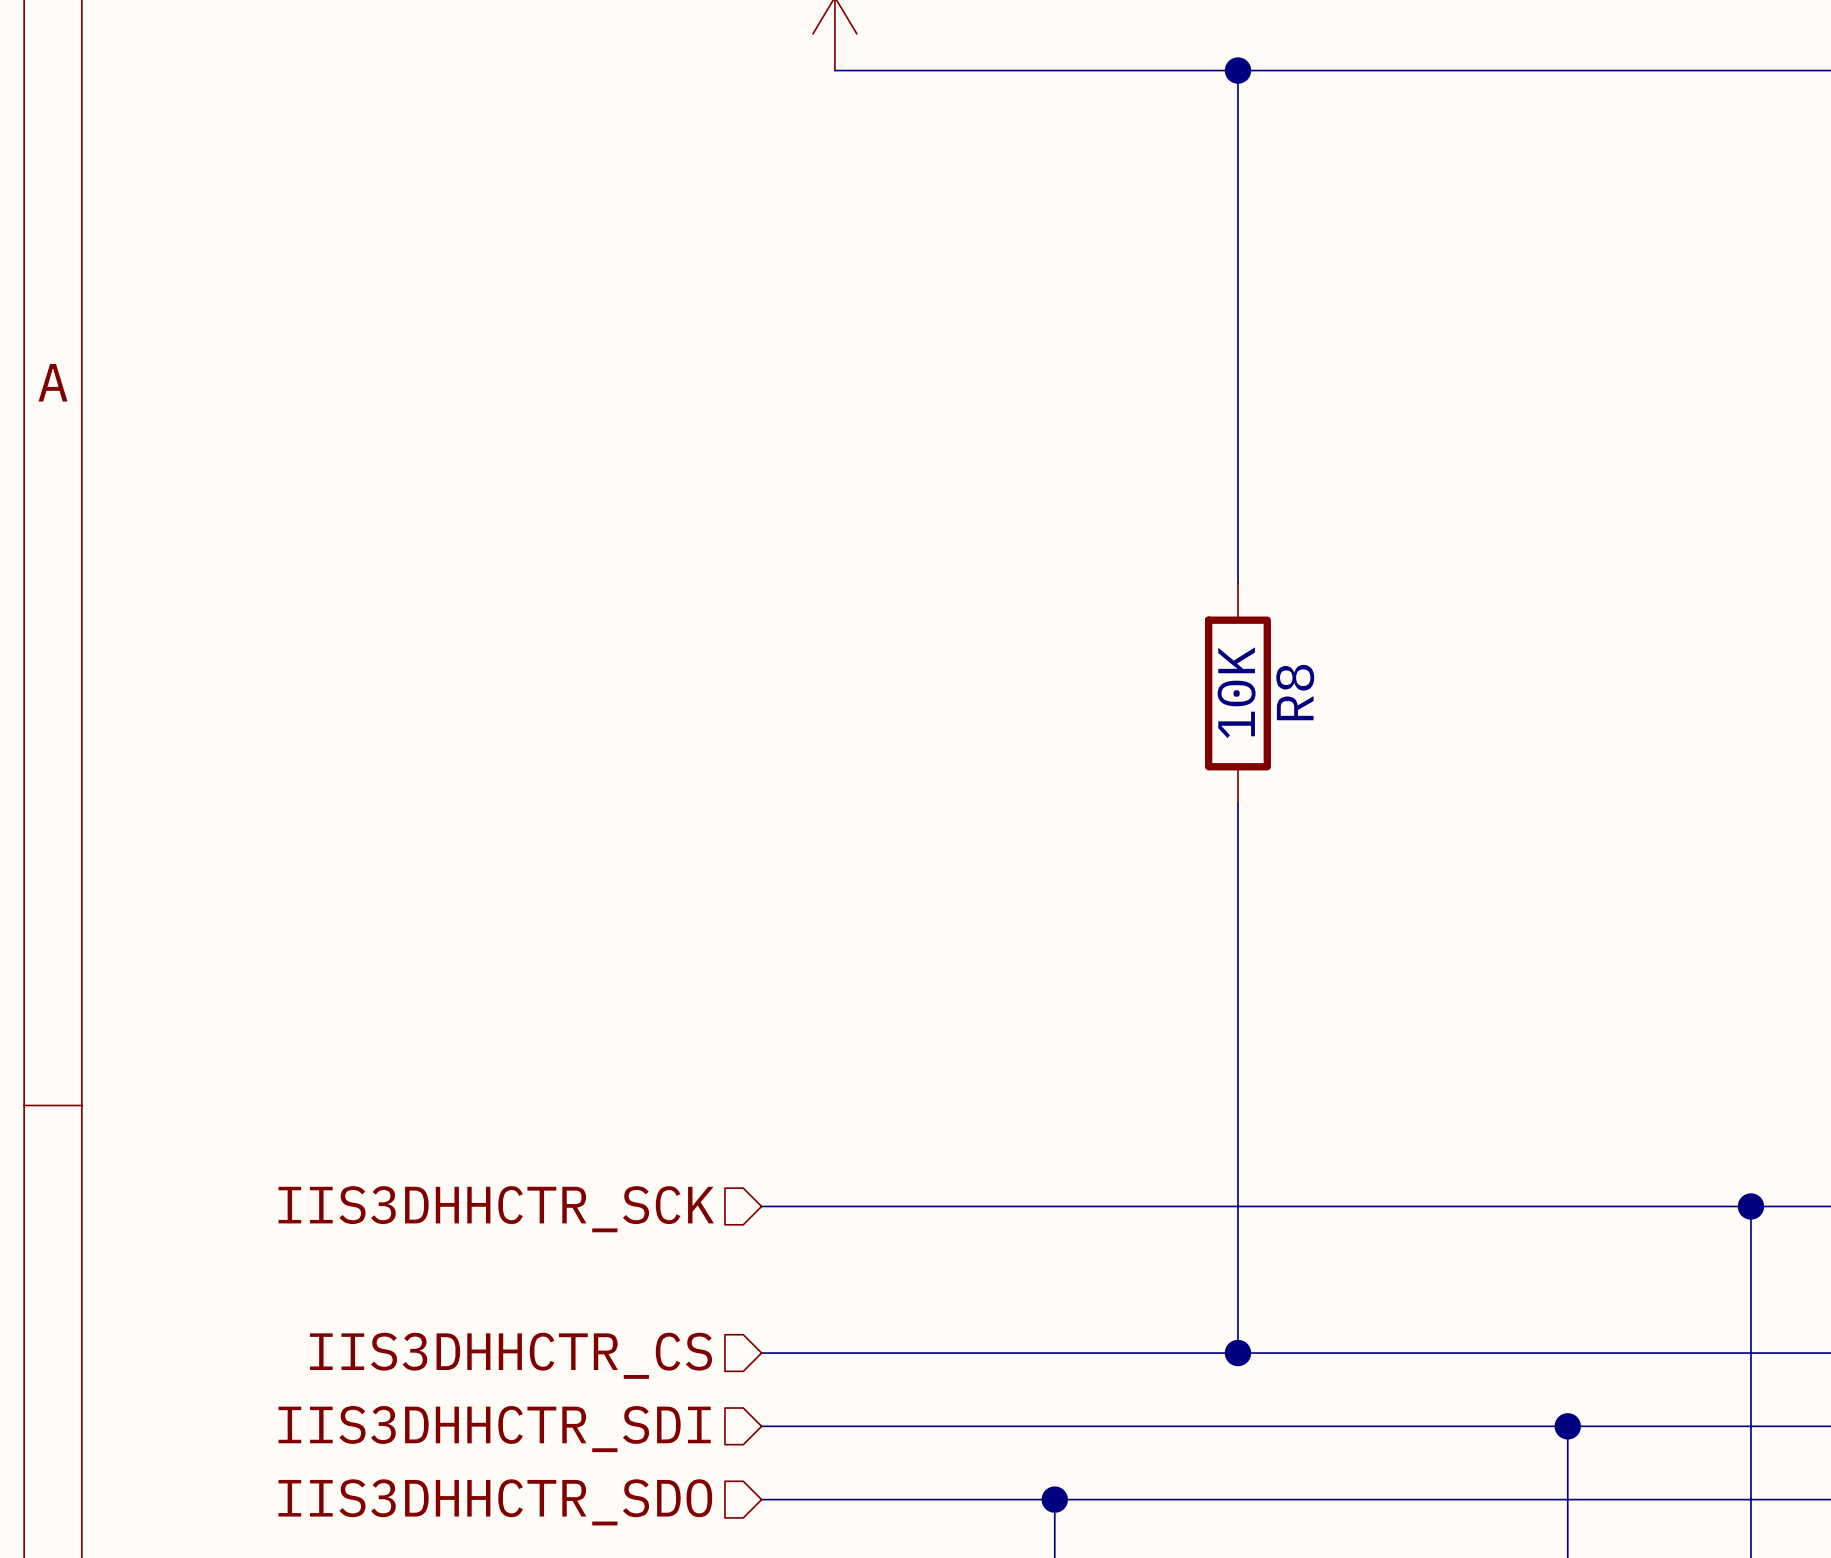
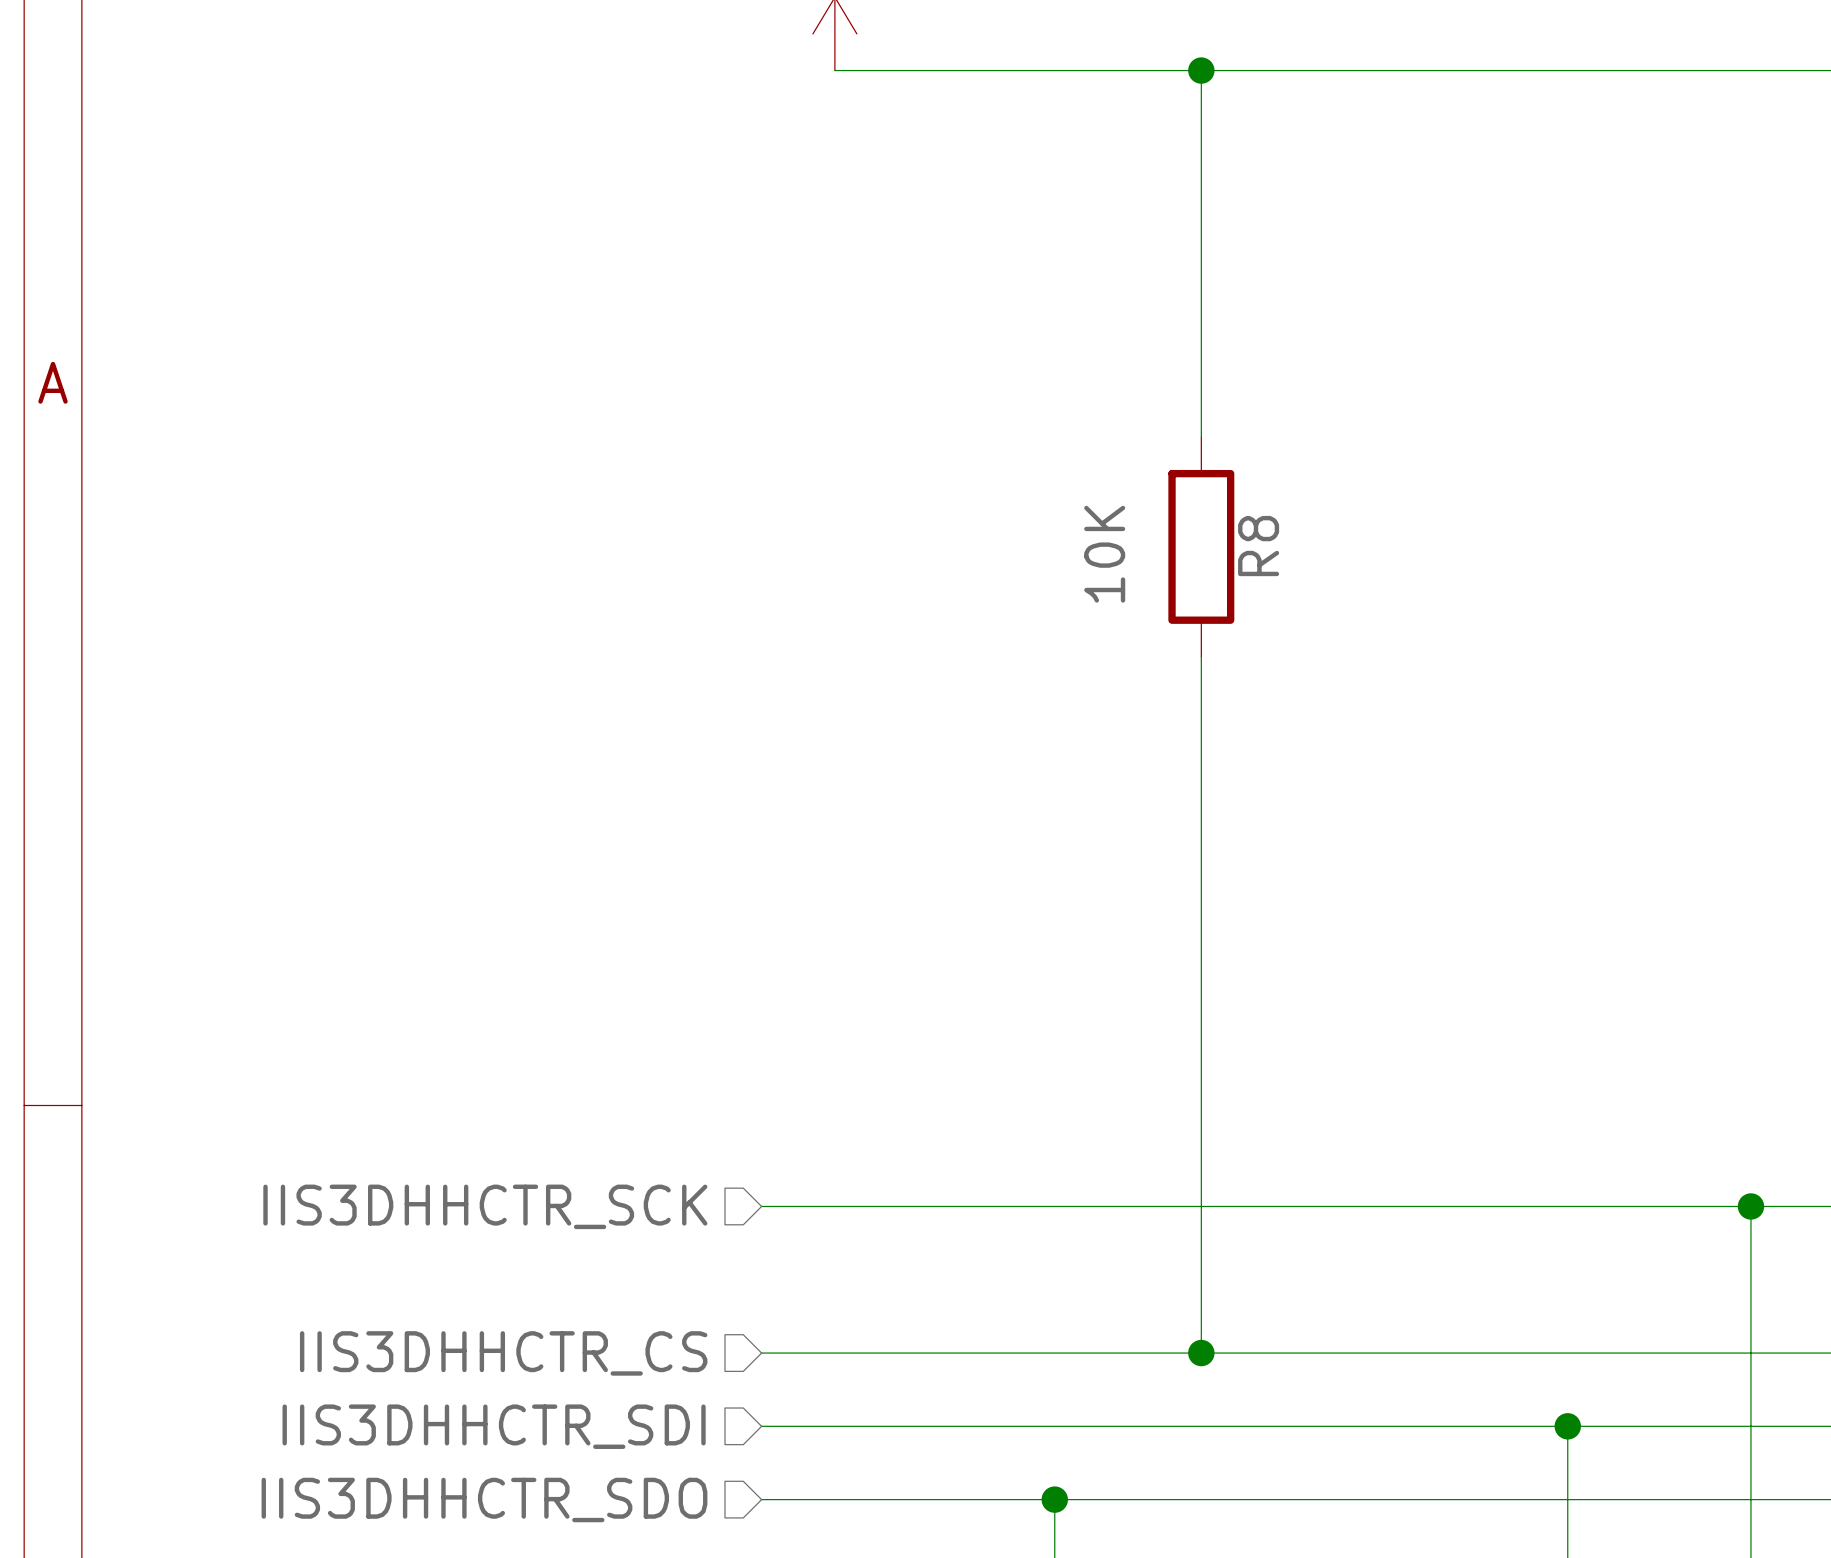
wire: none -> (1201, 70) (1201, 436)
wire: (1237, 70) (1237, 583) -> none
junction position: (1237, 70) -> (1201, 70)
wire: none -> (1201, 656) (1201, 1353)
R8 value position: 10K (1236, 692) -> 10K (1104, 554)
R8 position: (1237, 693) -> (1201, 546)
wire: (1237, 803) (1237, 1353) -> none
junction position: (1237, 1353) -> (1201, 1353)

